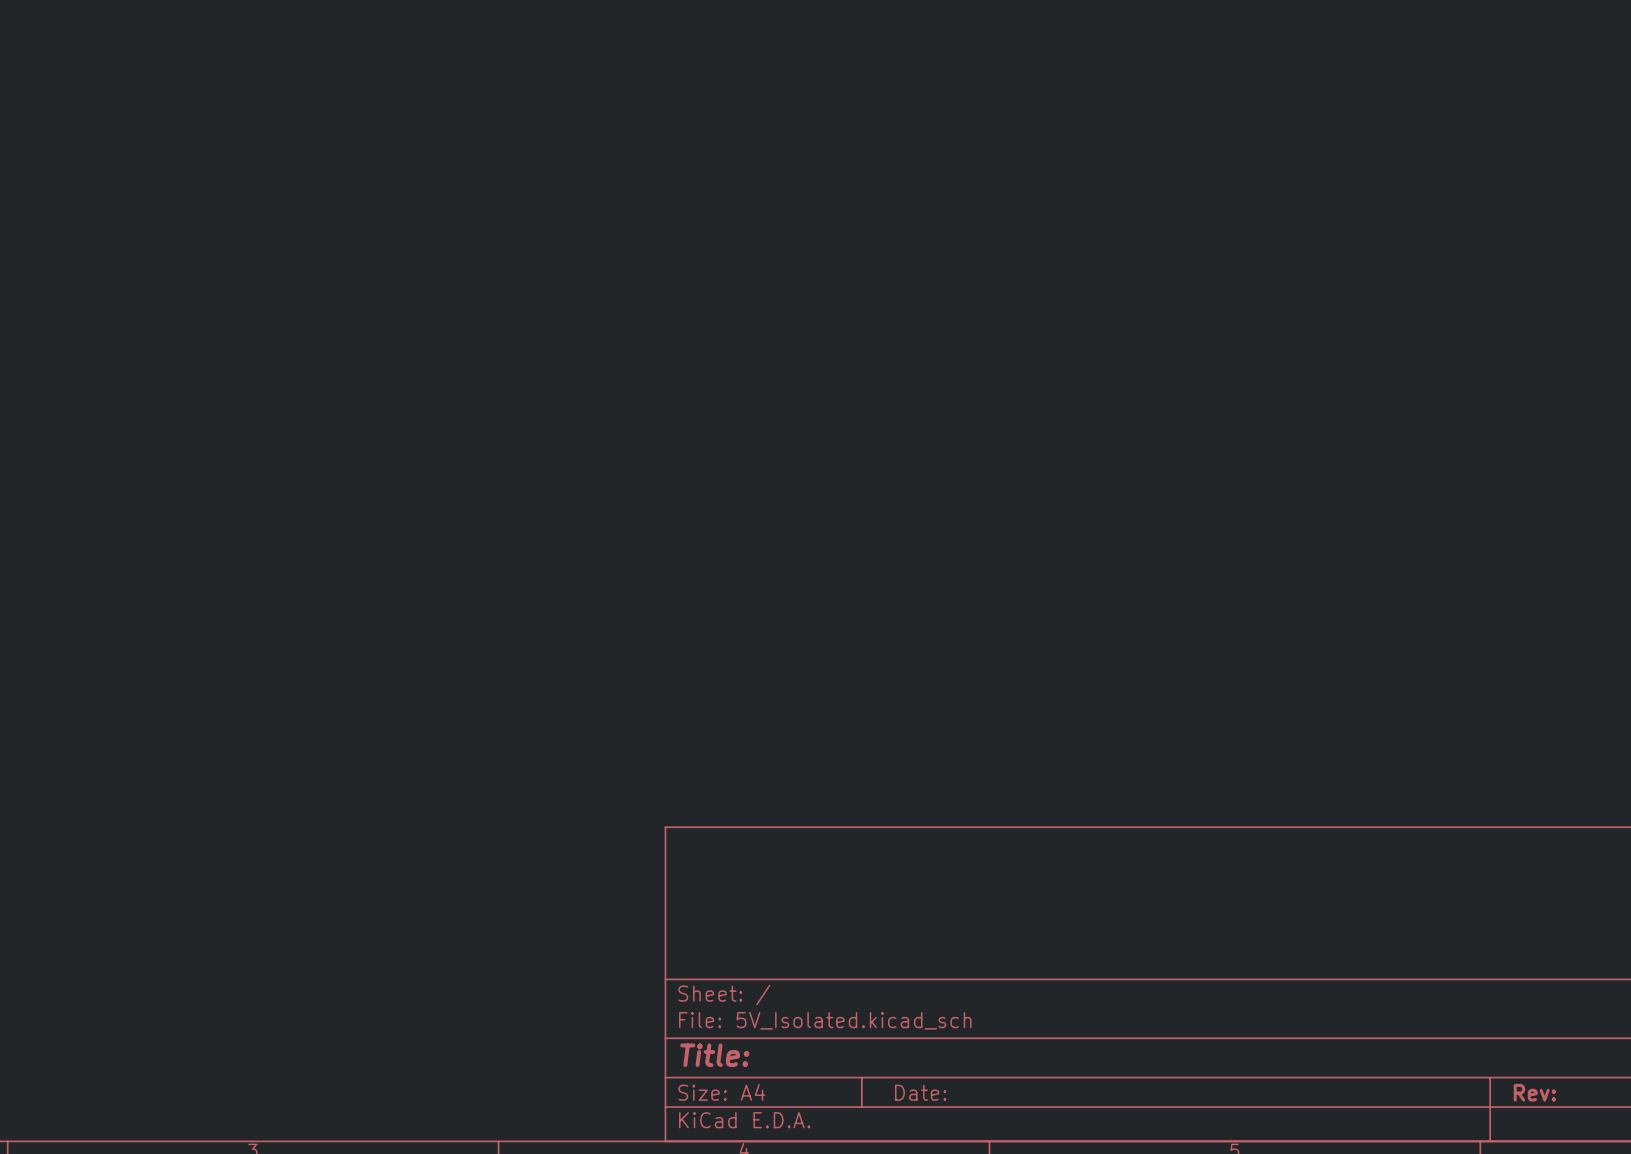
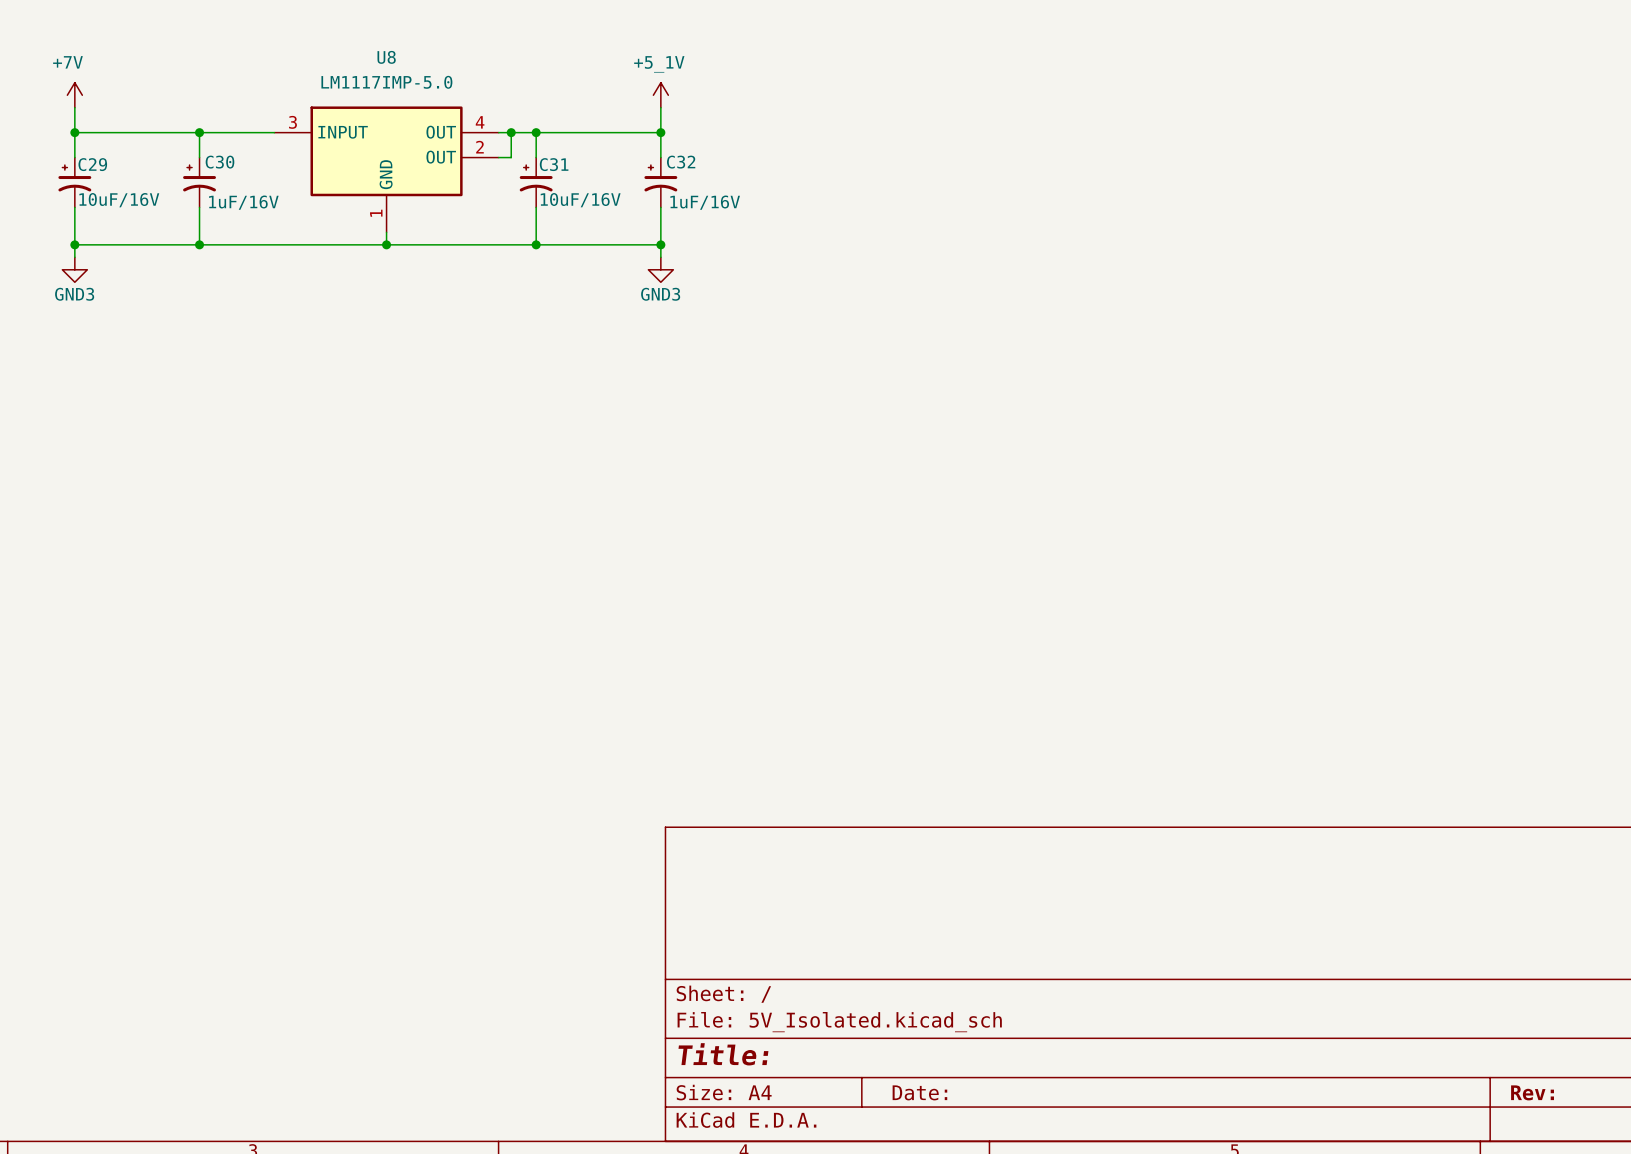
power symbol: none -> +7V (74, 95)
power symbol: none -> +5_1V (660, 95)
wire: none -> (74, 107) (74, 157)
wire: none -> (660, 107) (660, 157)
wire: none -> (74, 132) (274, 132)
junction: none -> (74, 132)
wire: none -> (199, 132) (199, 157)
junction: none -> (199, 132)
wire: none -> (498, 132) (660, 132)
wire: none -> (511, 132) (511, 157) (498, 157)
junction: none -> (511, 132)
wire: none -> (536, 132) (536, 157)
junction: none -> (536, 132)
junction: none -> (660, 132)
U8: none -> LM1117IMP-5.0 (386, 169)
C29: none -> 10uF/16V (74, 182)
C30: none -> 1uF/16V (199, 182)
C31: none -> 10uF/16V (536, 182)
C32: none -> 1uF/16V (660, 182)
wire: none -> (74, 207) (74, 257)
wire: none -> (199, 207) (199, 244)
wire: none -> (536, 207) (536, 244)
wire: none -> (660, 207) (660, 257)
wire: none -> (386, 232) (386, 244)
wire: none -> (74, 244) (660, 244)
junction: none -> (74, 244)
junction: none -> (199, 244)
junction: none -> (386, 244)
junction: none -> (536, 244)
junction: none -> (660, 244)
power symbol: none -> GND3 (74, 269)
power symbol: none -> GND3 (660, 269)

